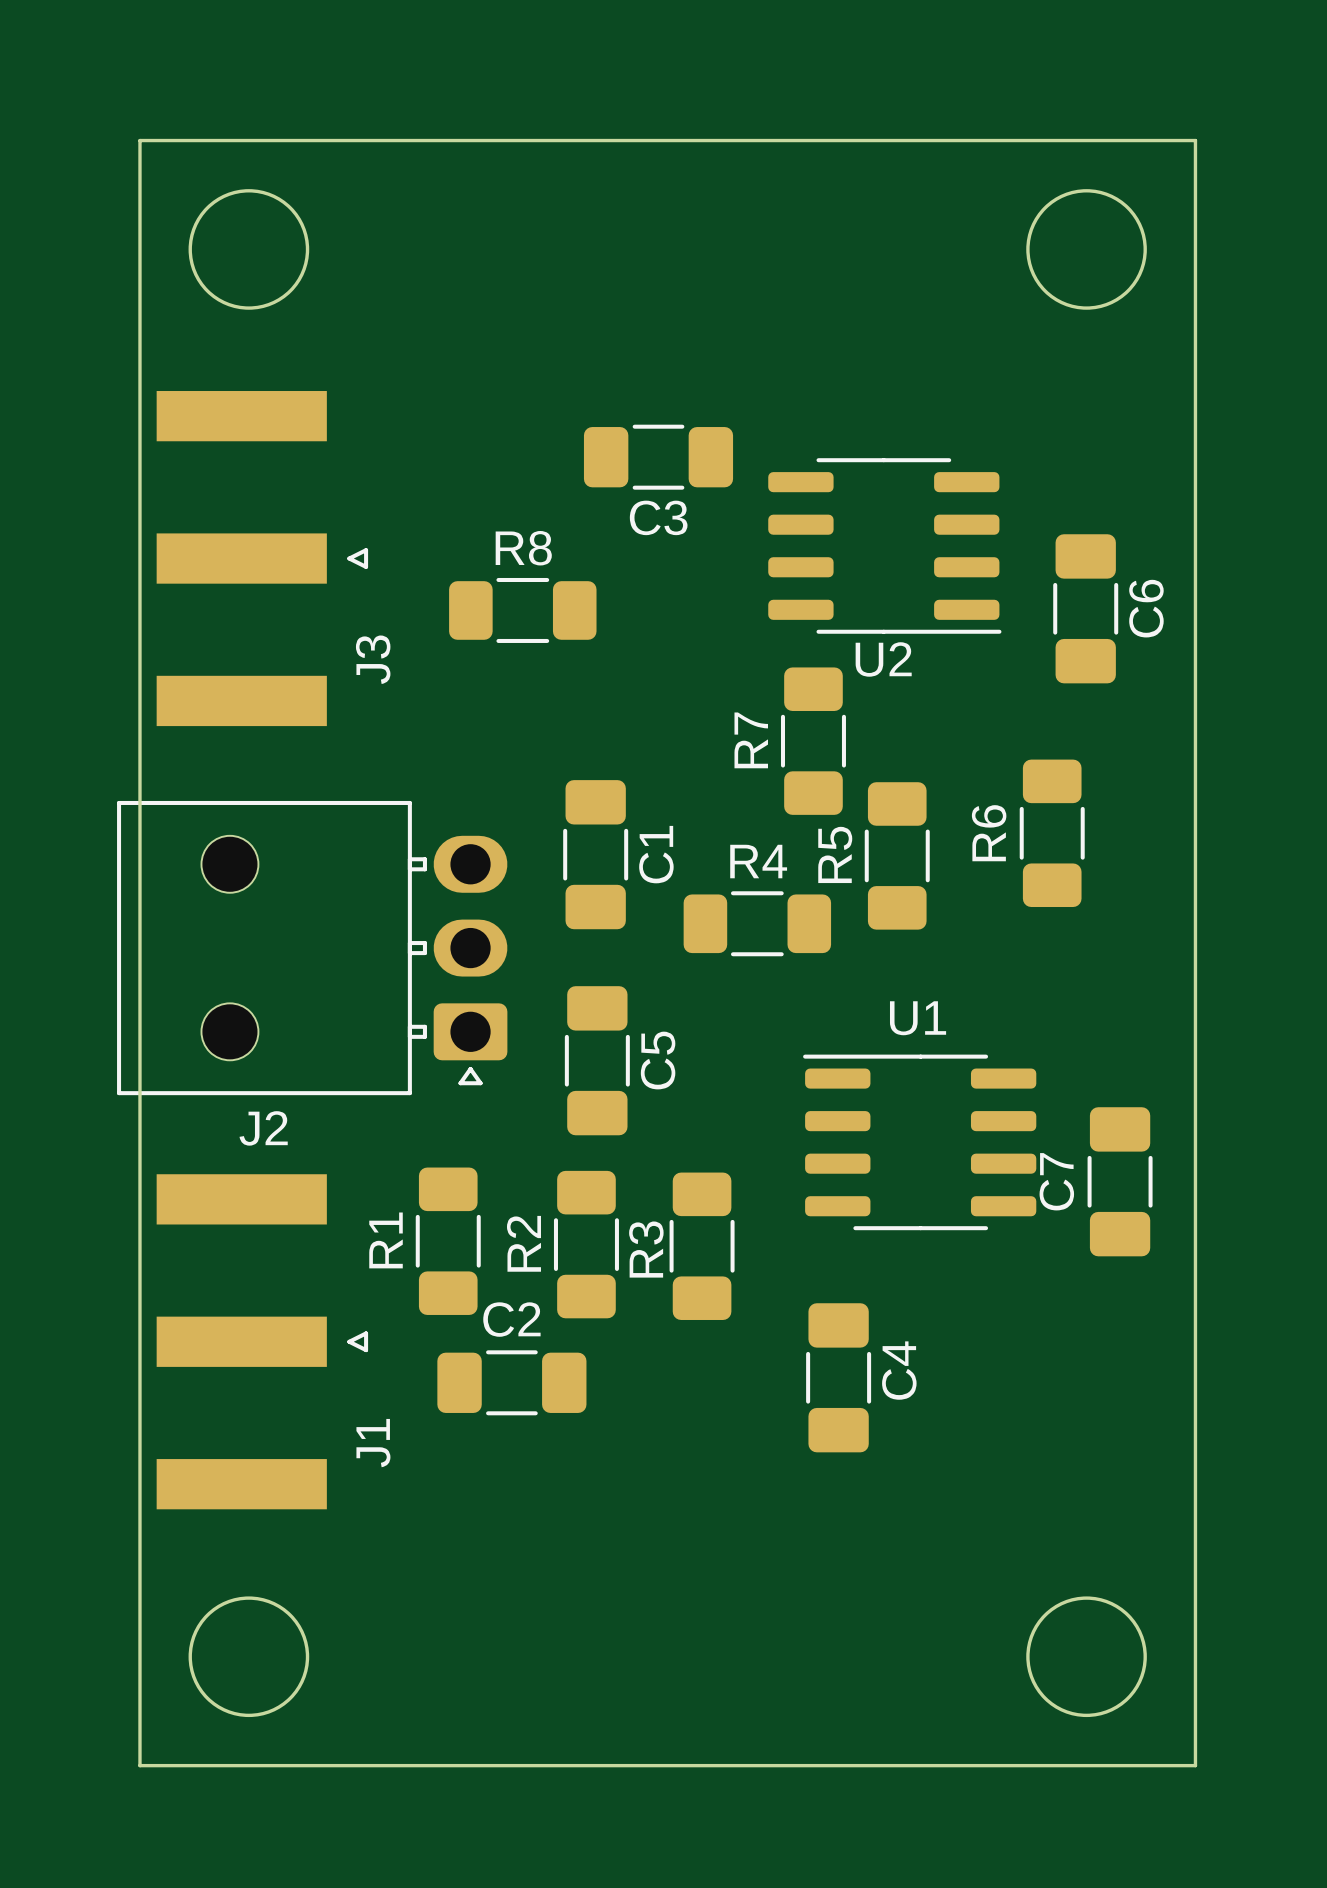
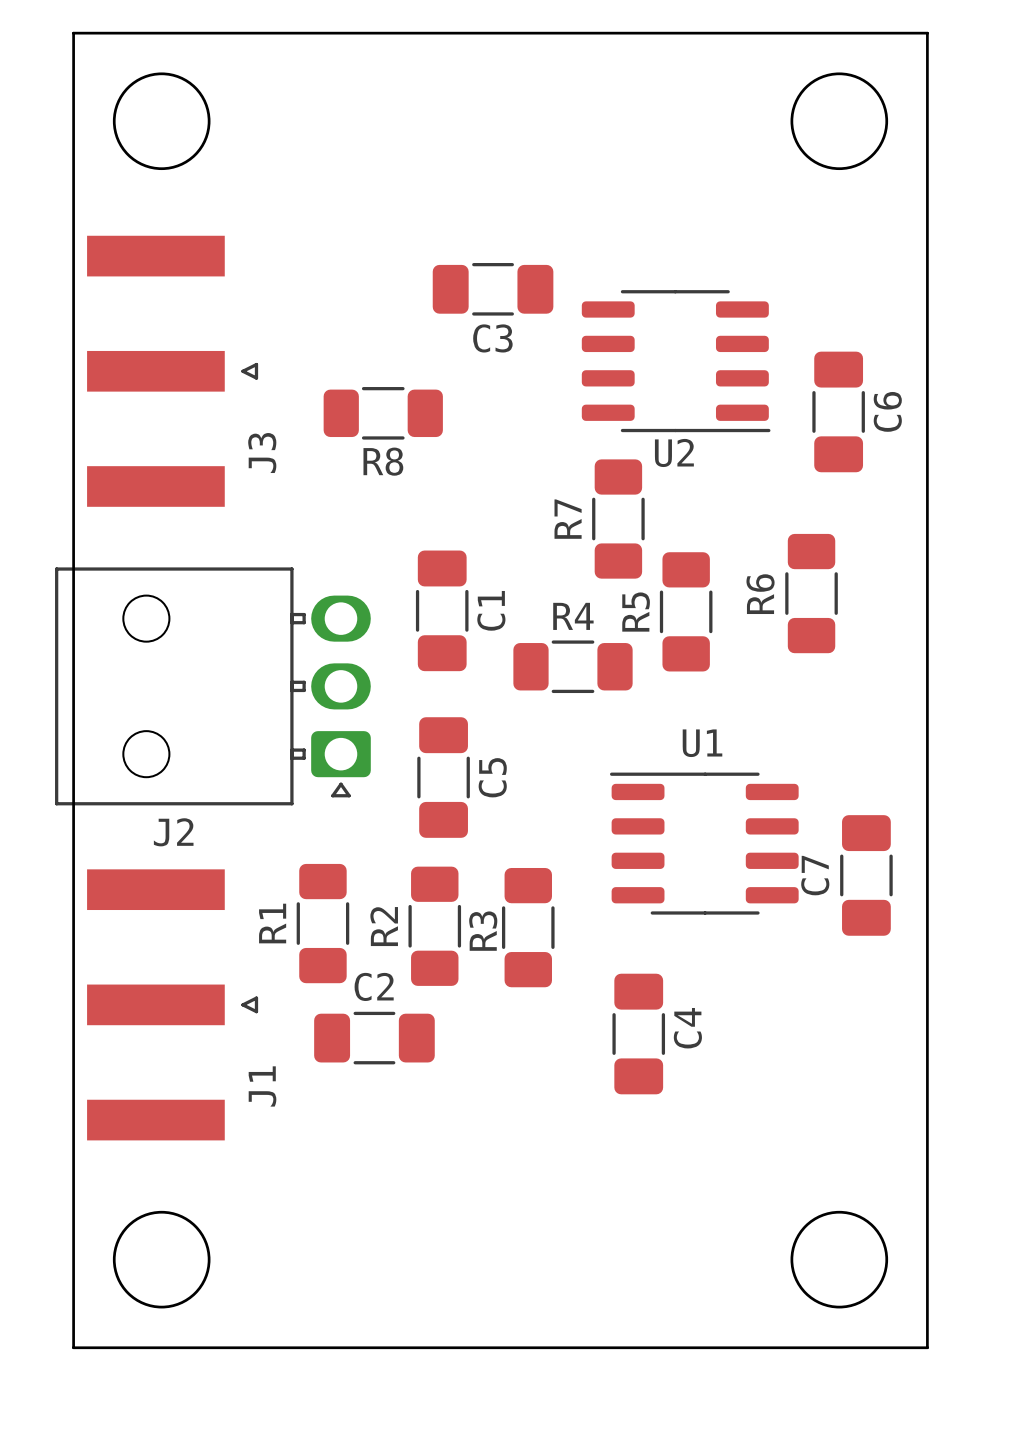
R8 name position: R8 (523, 548) -> R8 (383, 461)

